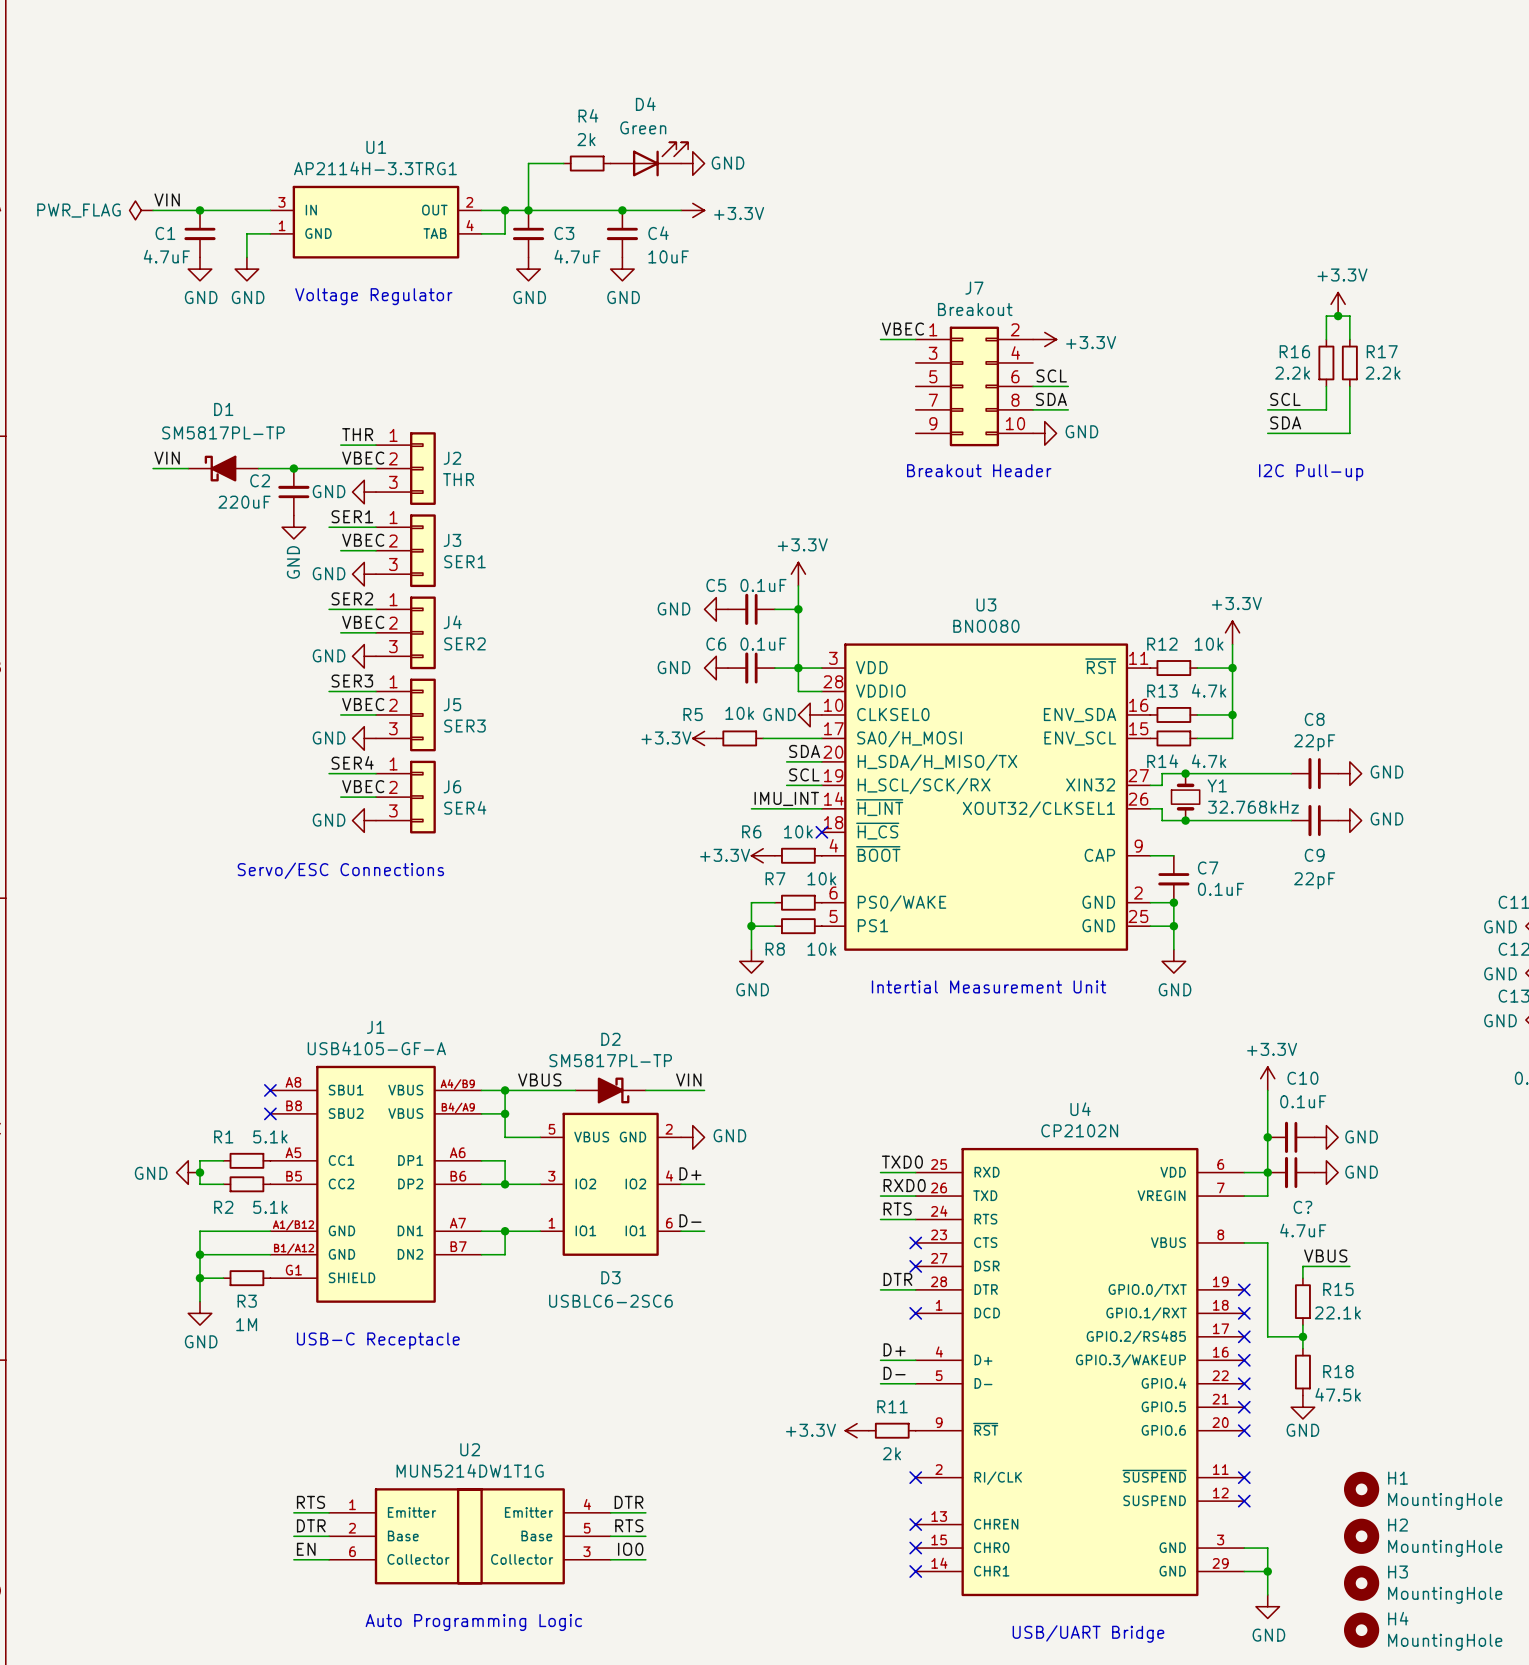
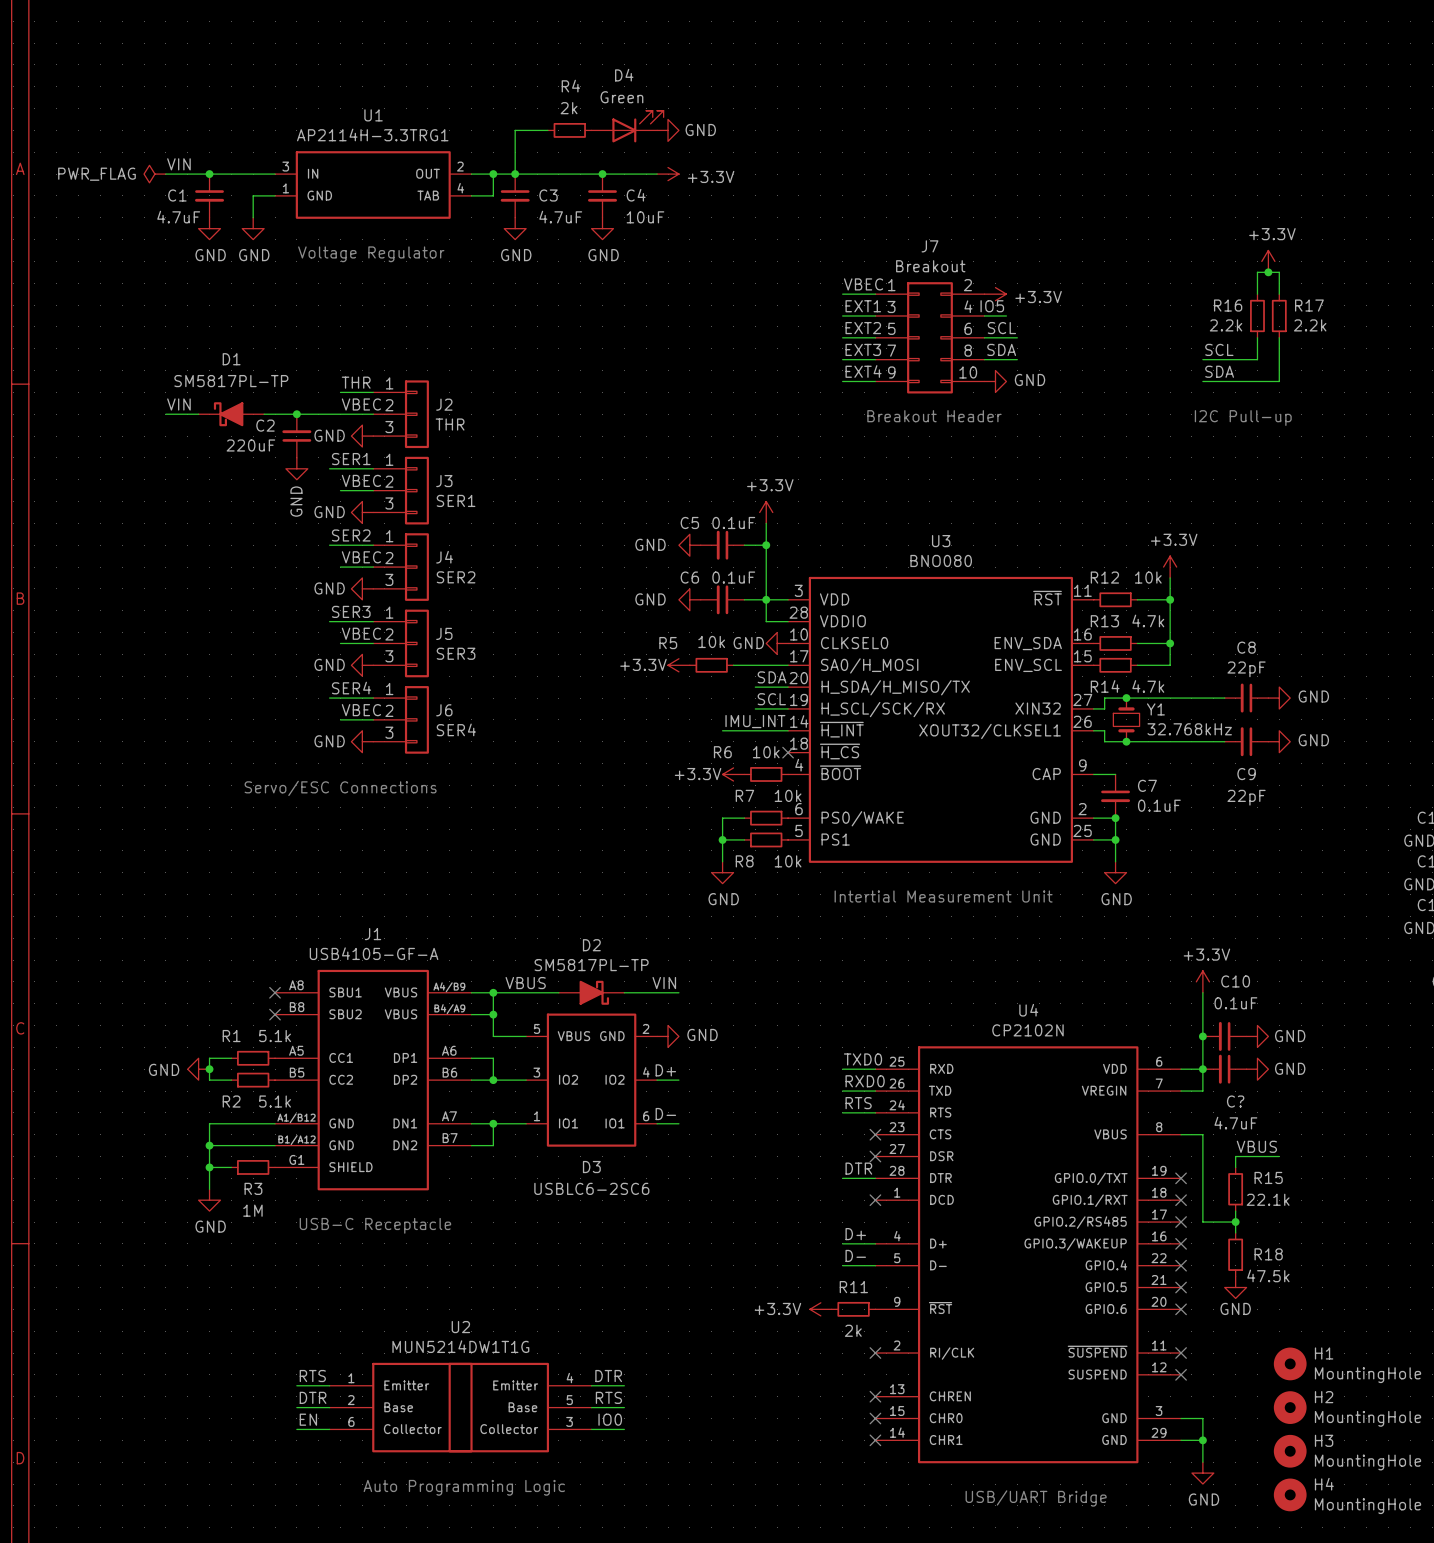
label: none -> EXT1 (863, 306)
label: none -> IO5 (992, 306)
wire: none -> (842, 315) (875, 315)
wire: none -> (984, 315) (1006, 315)
label: none -> EXT2 (863, 328)
wire: none -> (842, 337) (875, 337)
label: none -> EXT3 (863, 349)
wire: none -> (842, 359) (875, 359)
label: none -> EXT4 (863, 371)
wire: none -> (842, 381) (875, 381)

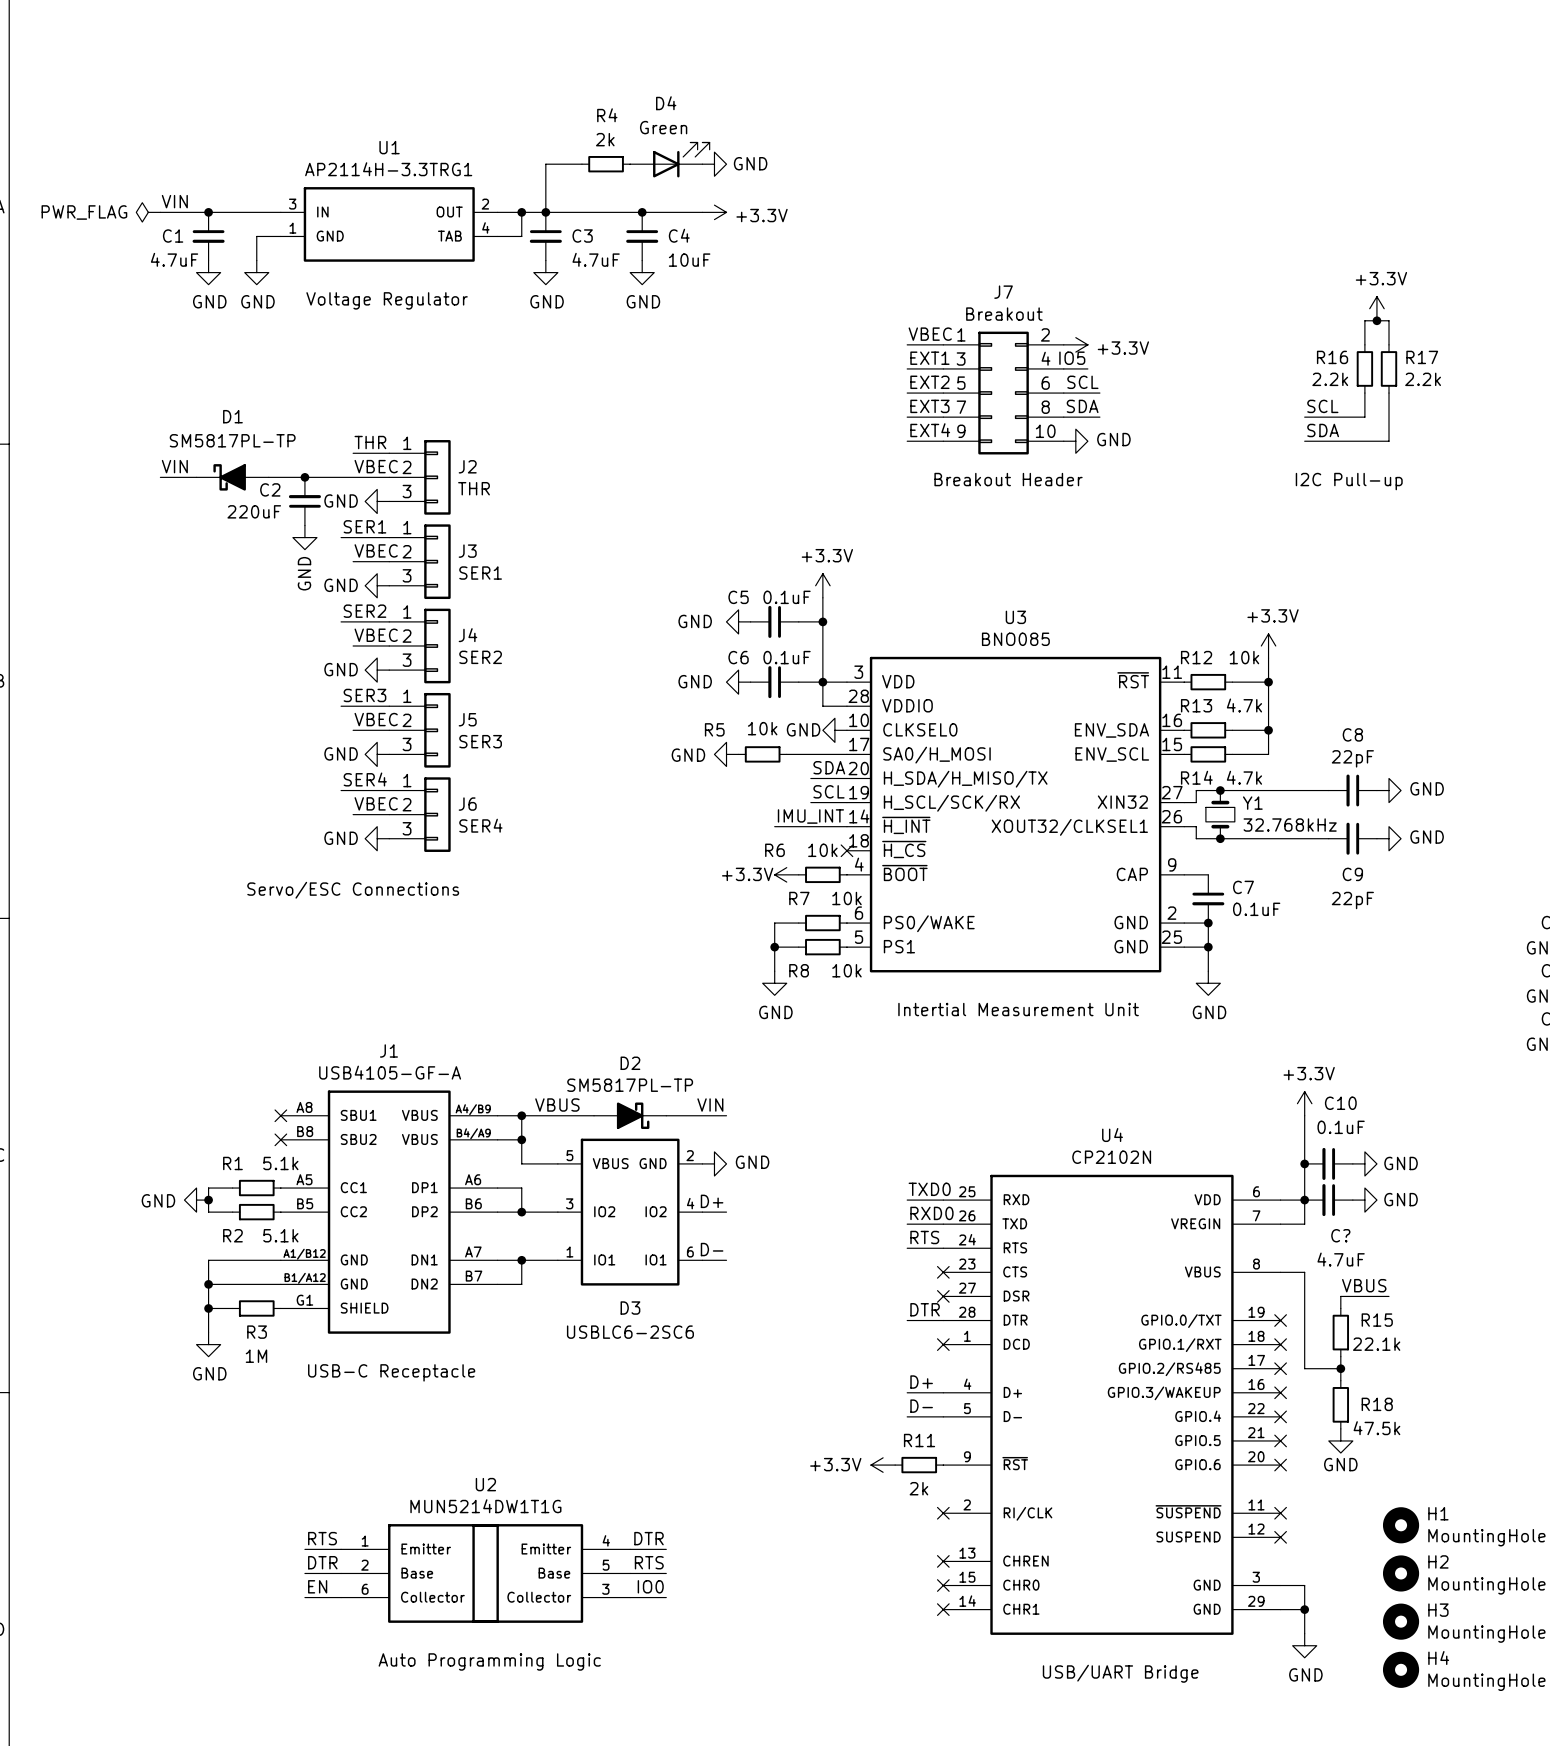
U3 value: BNO080 (941, 560) -> BNO085 (1015, 639)
power symbol: +3.3V (678, 665) -> GND (726, 754)

